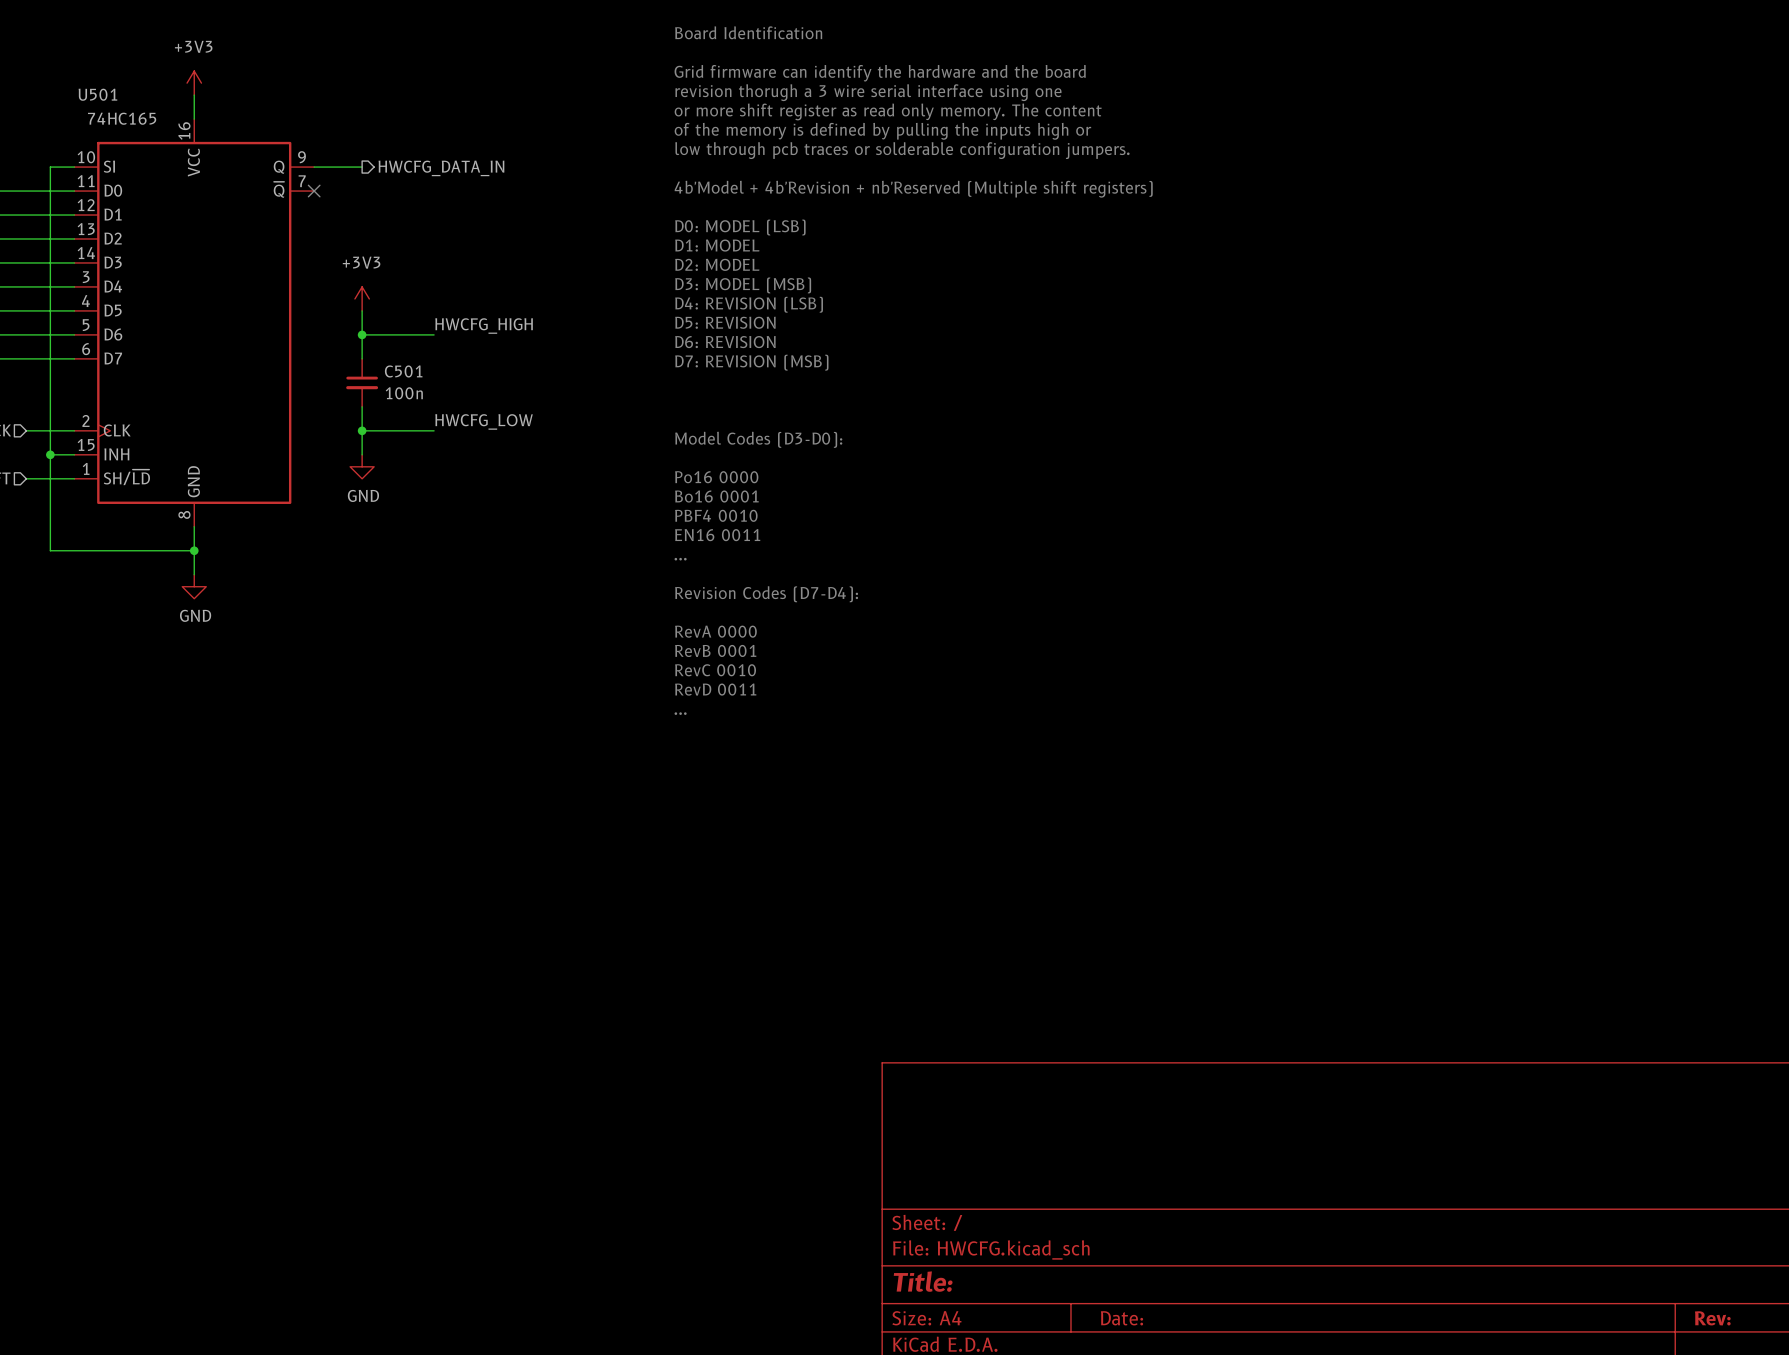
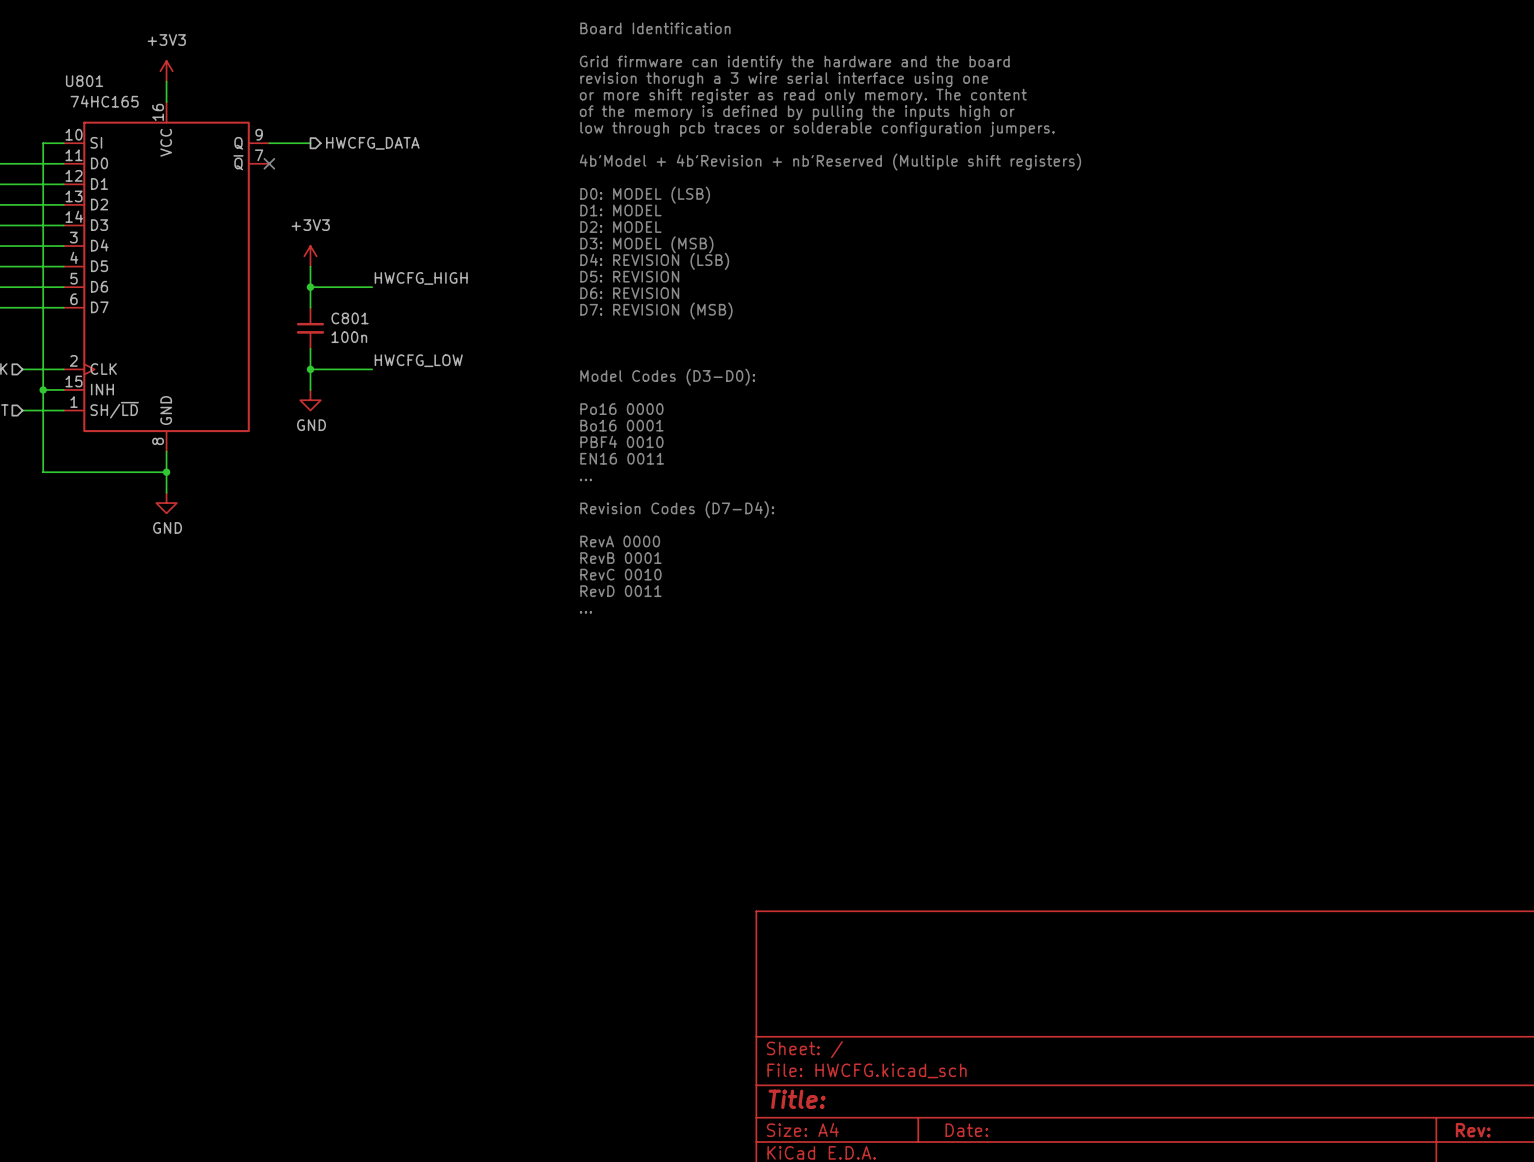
U501 name: U501 (97, 94) -> U801 (84, 81)
hierarchical label: HWCFG_DATA_IN (441, 168) -> HWCFG_DATA (372, 143)
C501 name: C501 (403, 371) -> C801 (350, 318)

